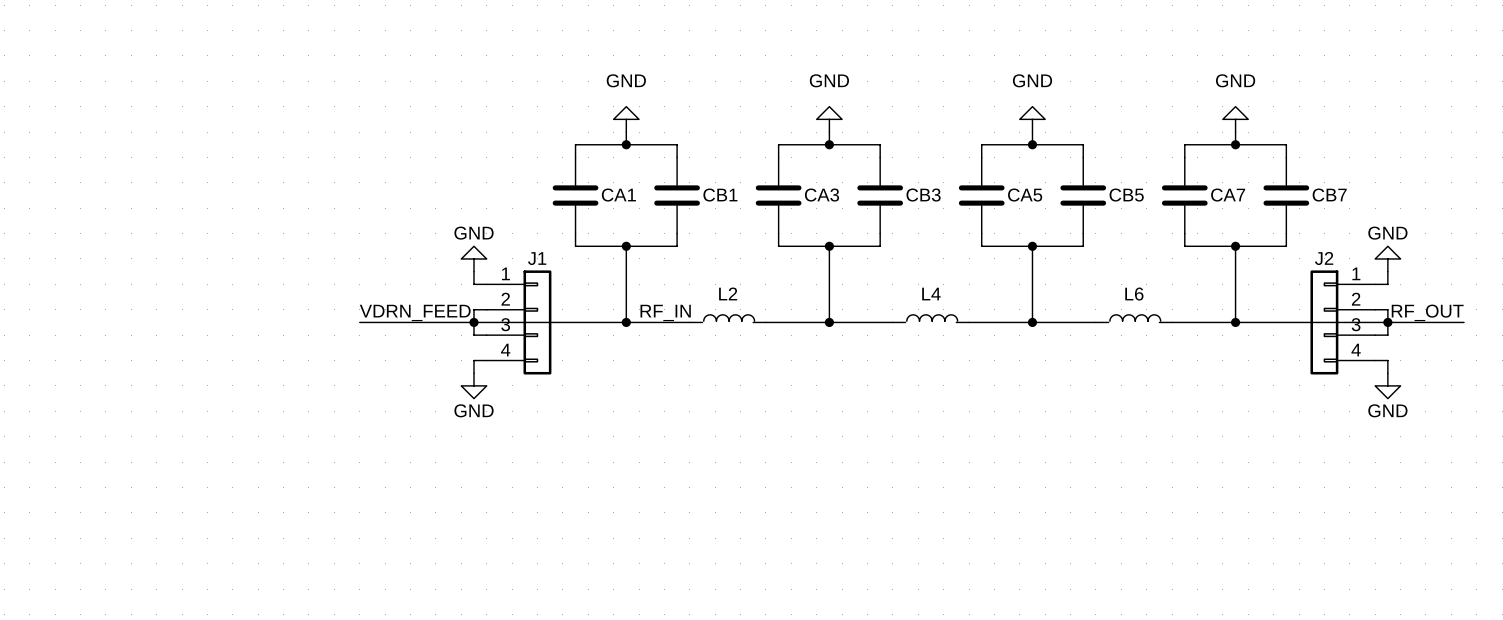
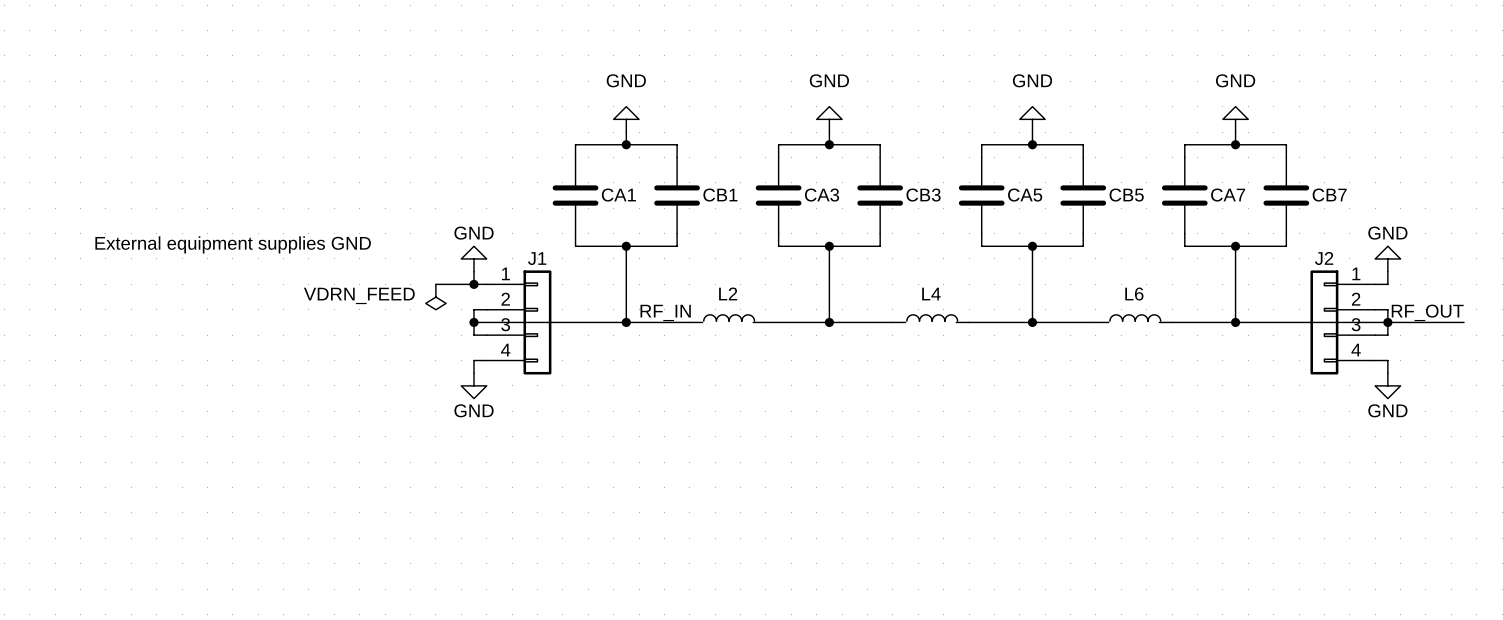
text: none -> External equipment supplies GND (233, 244)
wire: none -> (435, 284) (473, 284)
junction: none -> (473, 284)
text: none -> VDRN_FEED (359, 295)
power symbol: none -> (435, 297)
label: VDRN_FEED (415, 312) -> none
wire: (359, 322) (473, 322) -> none

